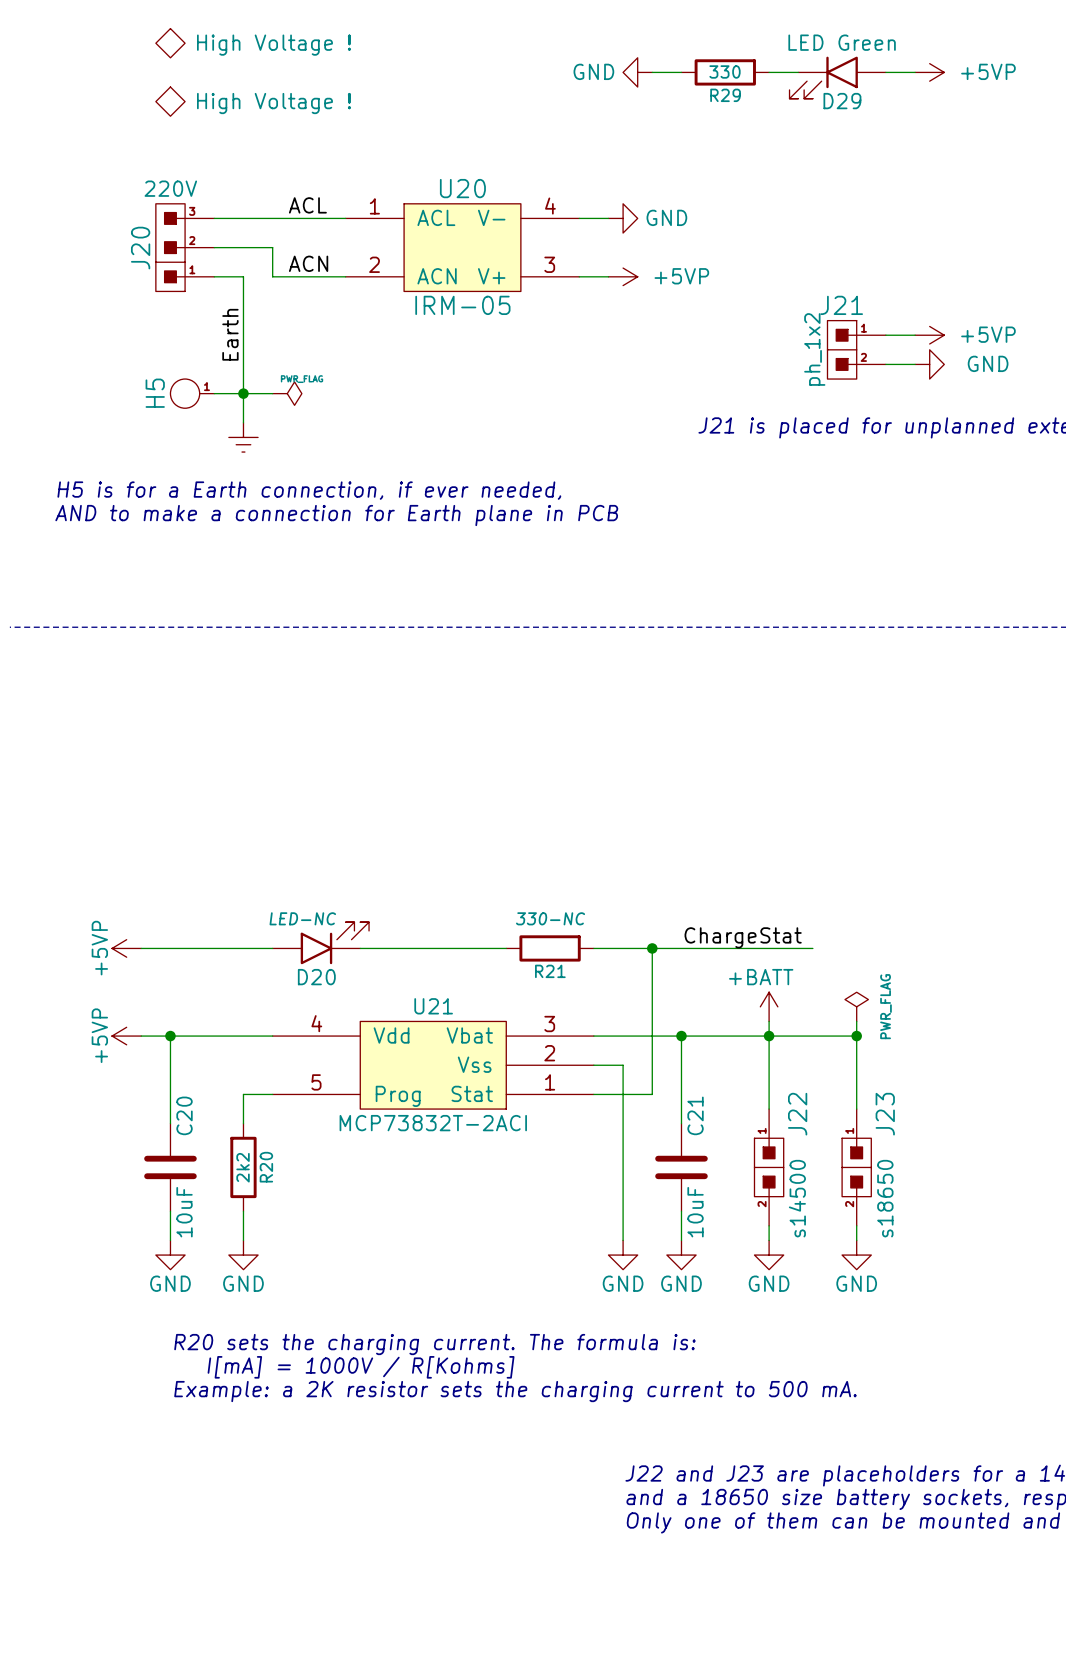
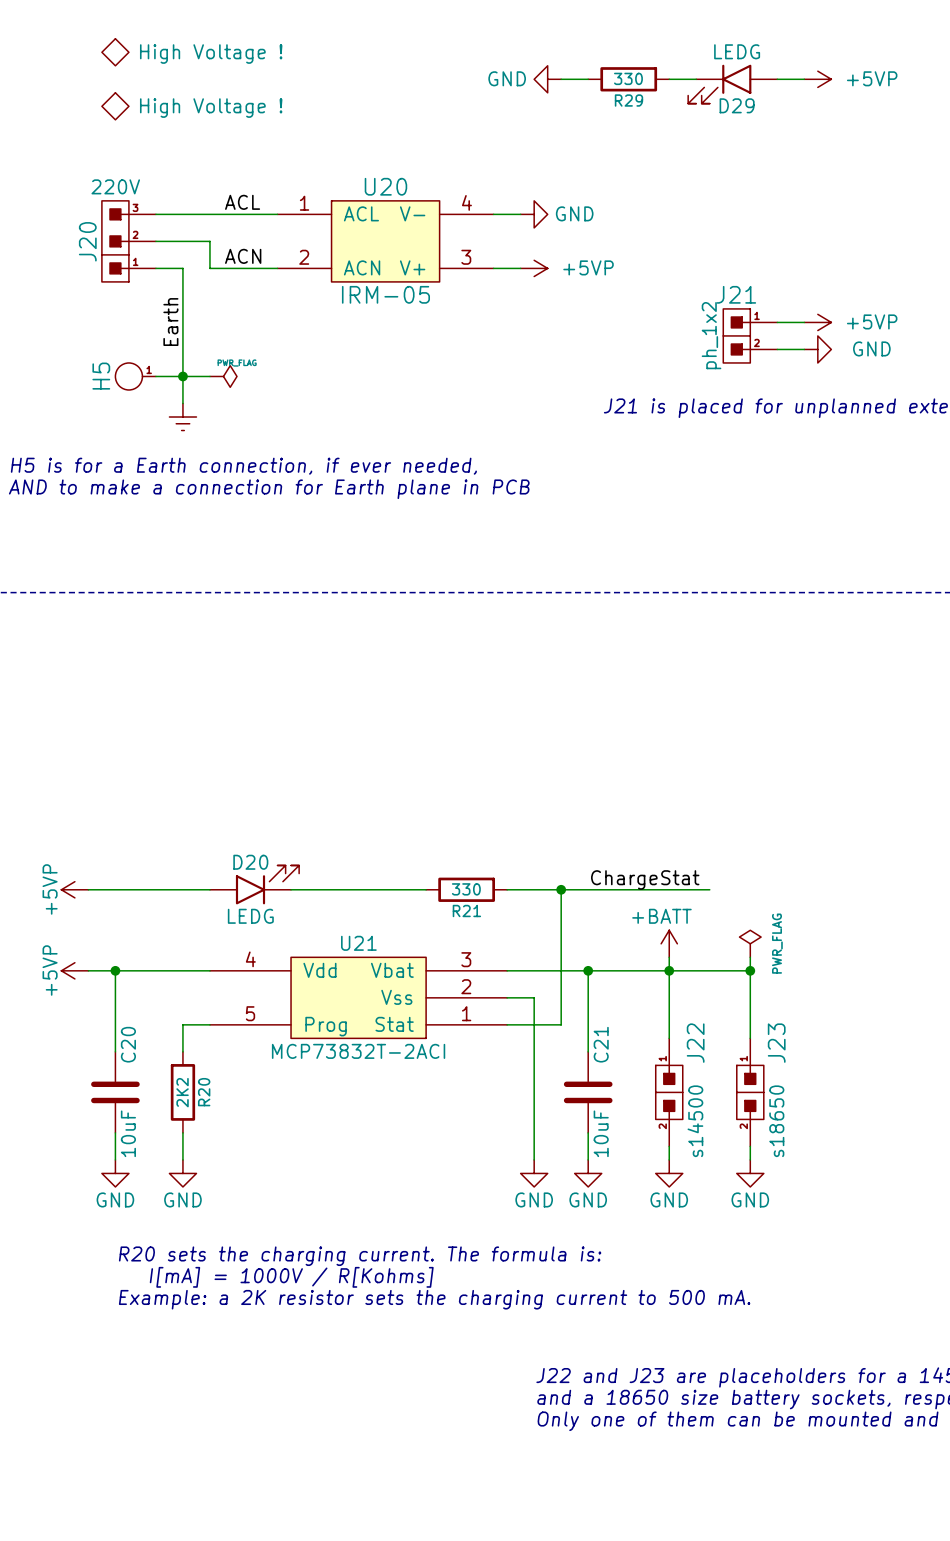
D29 value: LED Green (842, 42) -> LEDG (737, 51)
D20 value: LED-NC (302, 918) -> LEDG (250, 916)
R21 value: 330-NC (550, 918) -> 330 (466, 889)
D20 name position: D20 (316, 977) -> D20 (250, 862)
R20 value: 2k2 (243, 1167) -> 2K2 (182, 1092)

